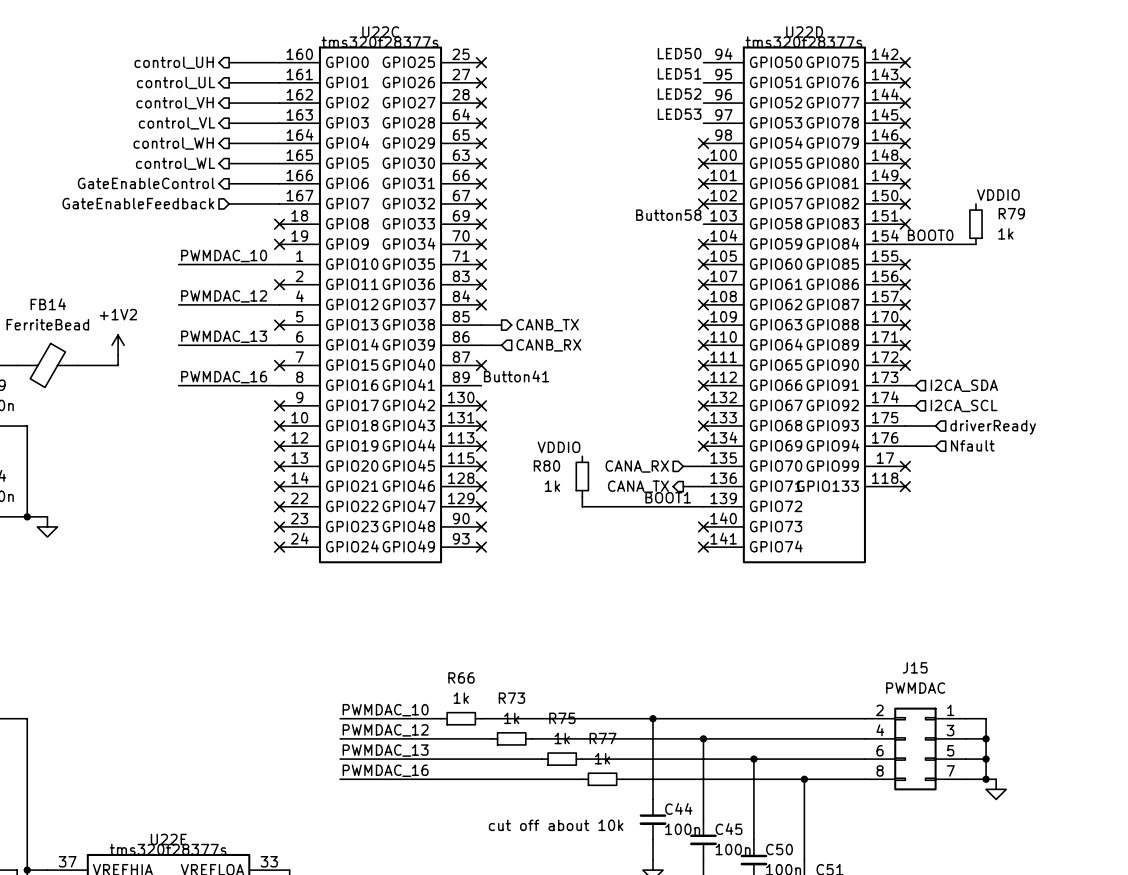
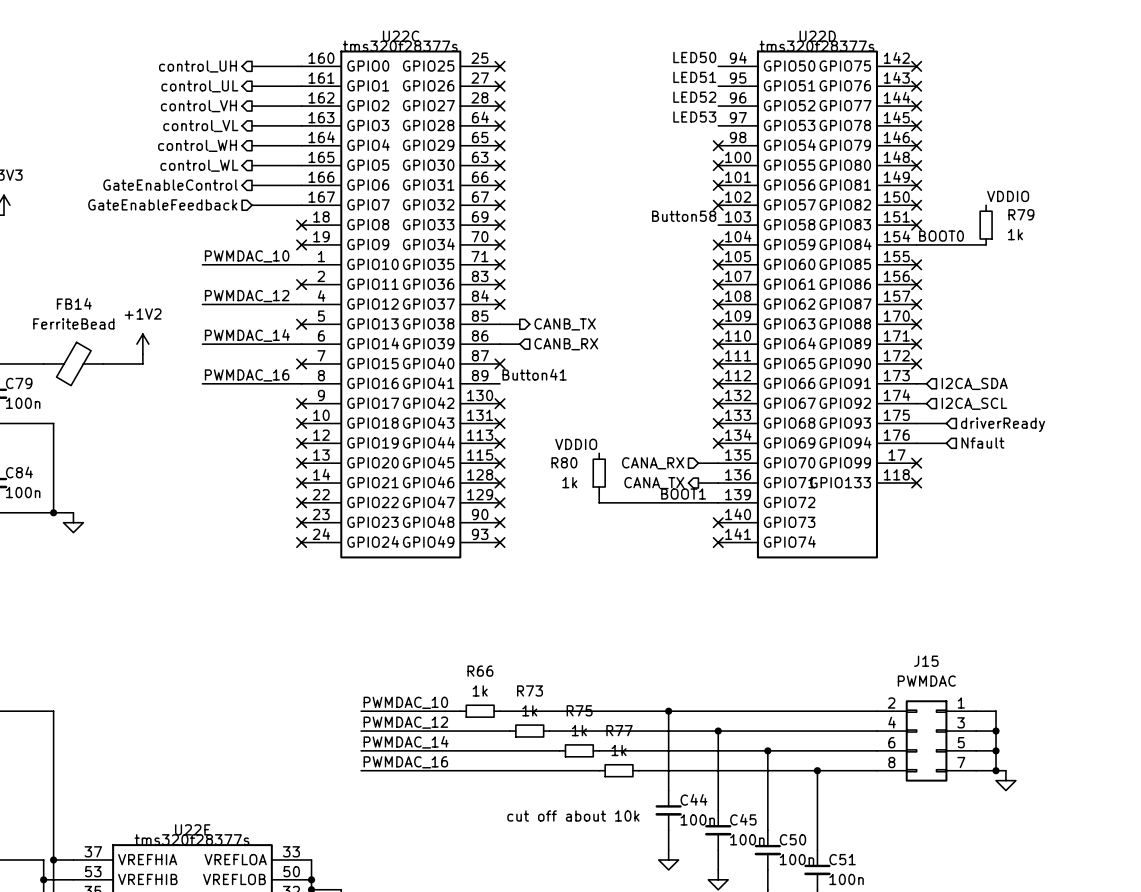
label: PWMDAC_13 (224, 336) -> PWMDAC_14 (247, 335)
label: PWMDAC_13 (385, 750) -> PWMDAC_14 (406, 742)

